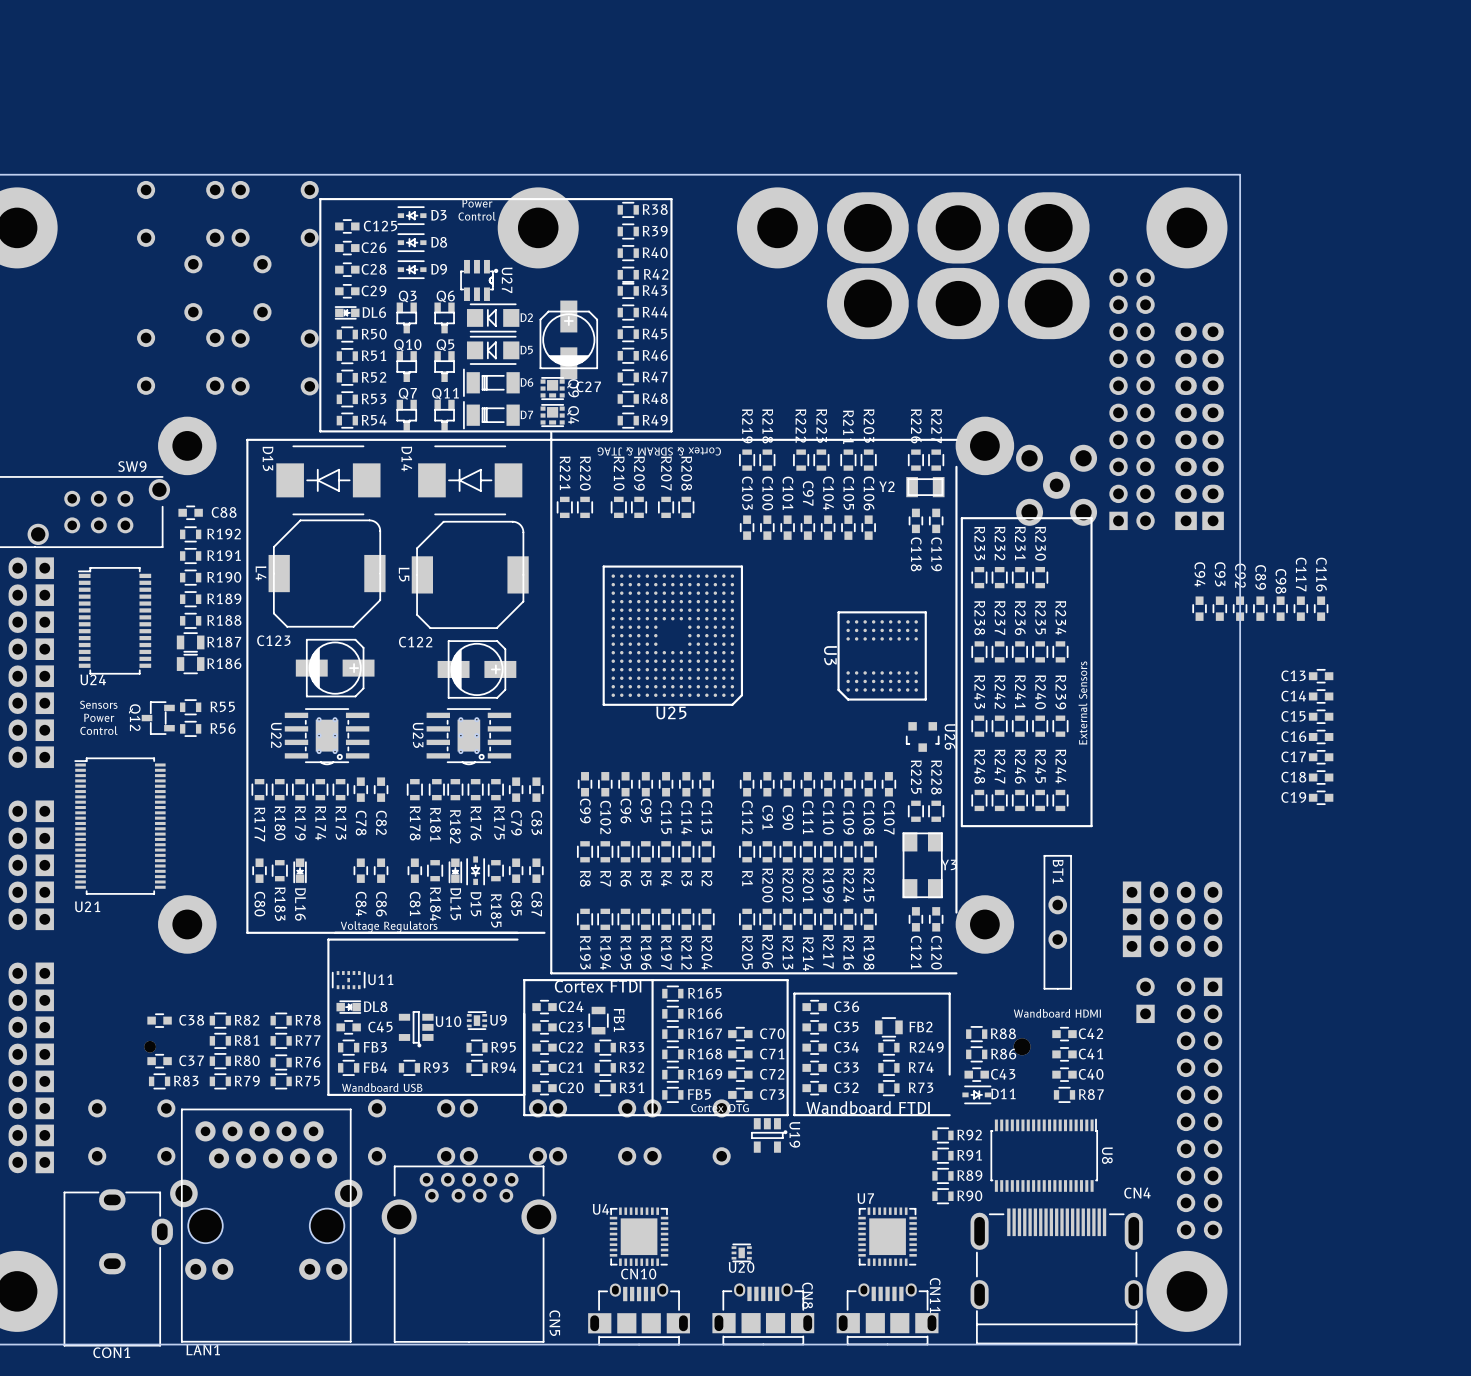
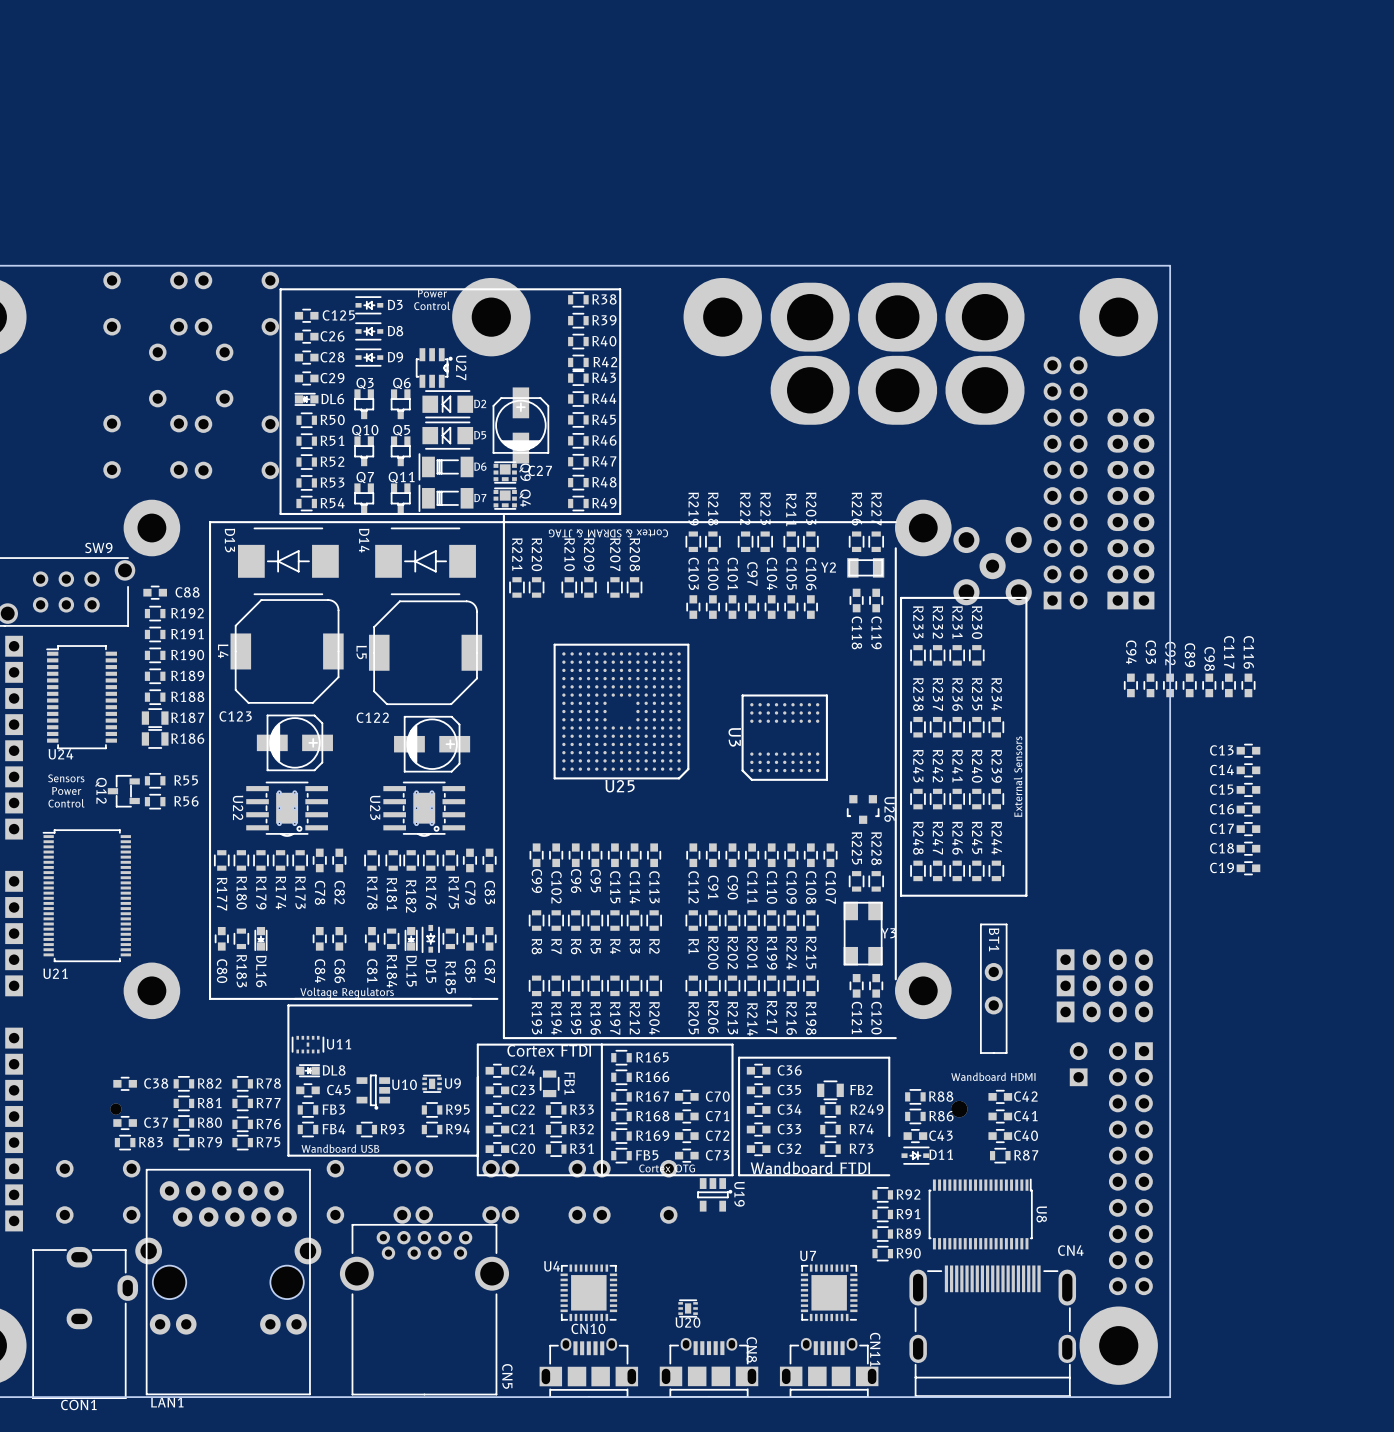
U3 position: (882, 655) -> (784, 737)

